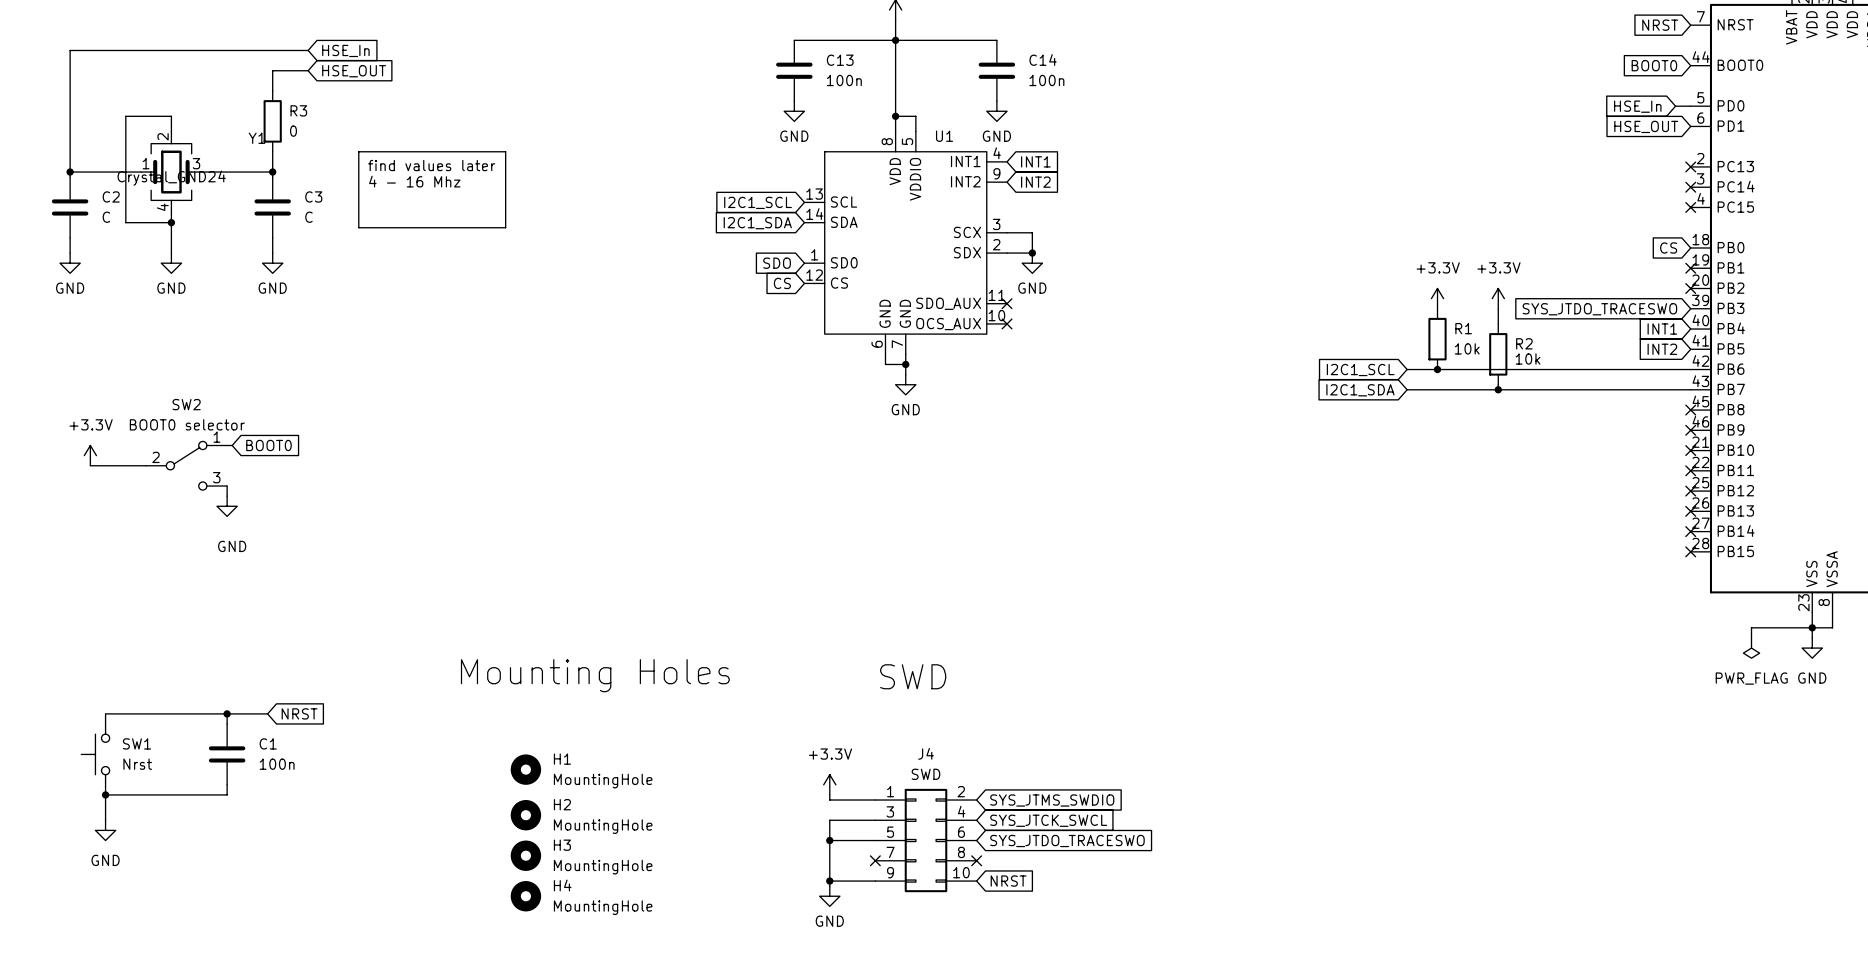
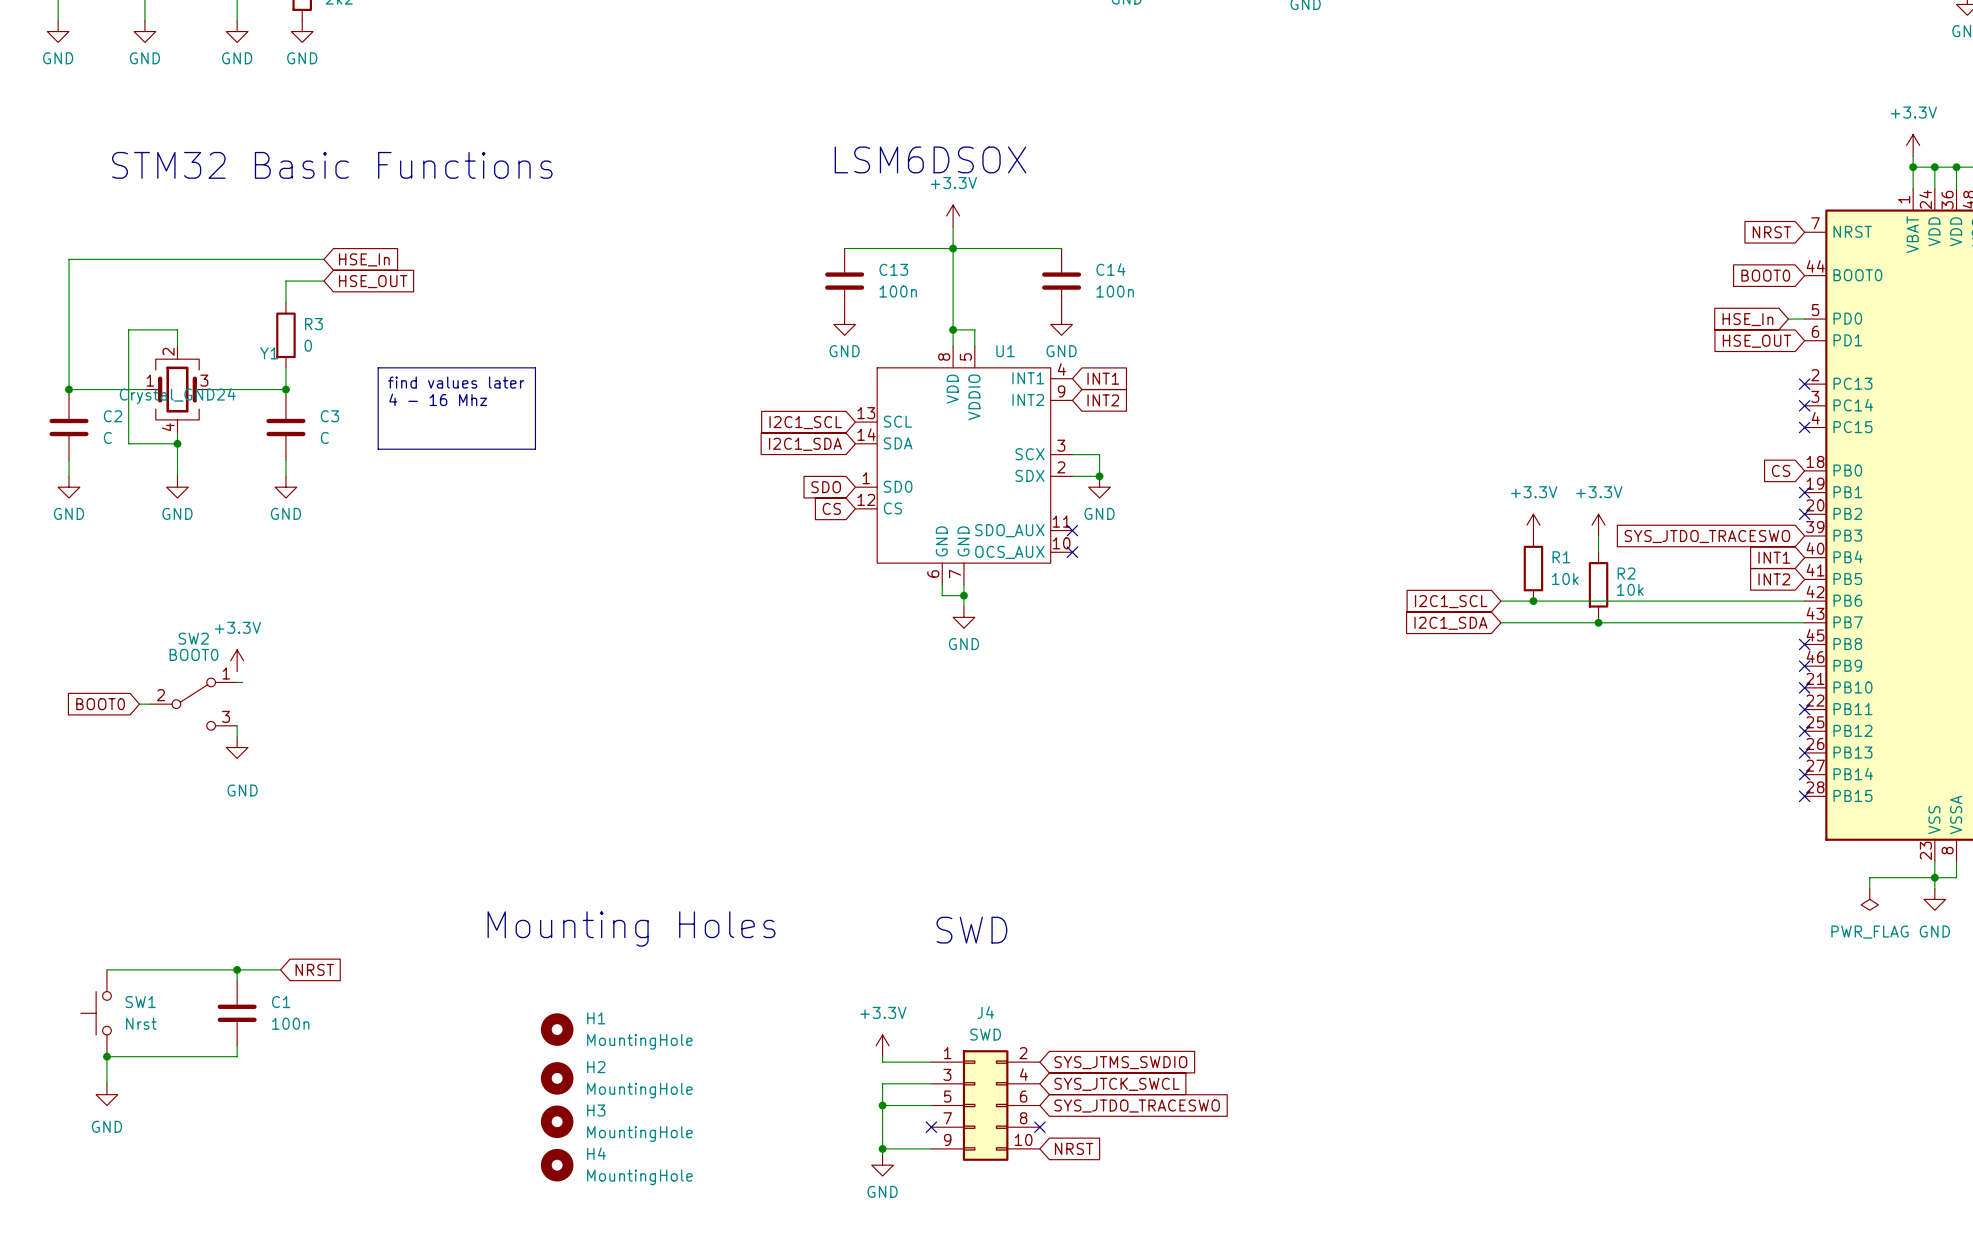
SW2 value: BOOT0 selector (187, 424) -> BOOT0 (194, 654)
global label rotation: 0° (268, 445) -> 180° (100, 704)
global label position: BOOT0 (268, 445) -> BOOT0 (100, 704)
power symbol position: +3.3V (90, 455) -> +3.3V (237, 660)
wire: (90, 465) (135, 465) -> none

